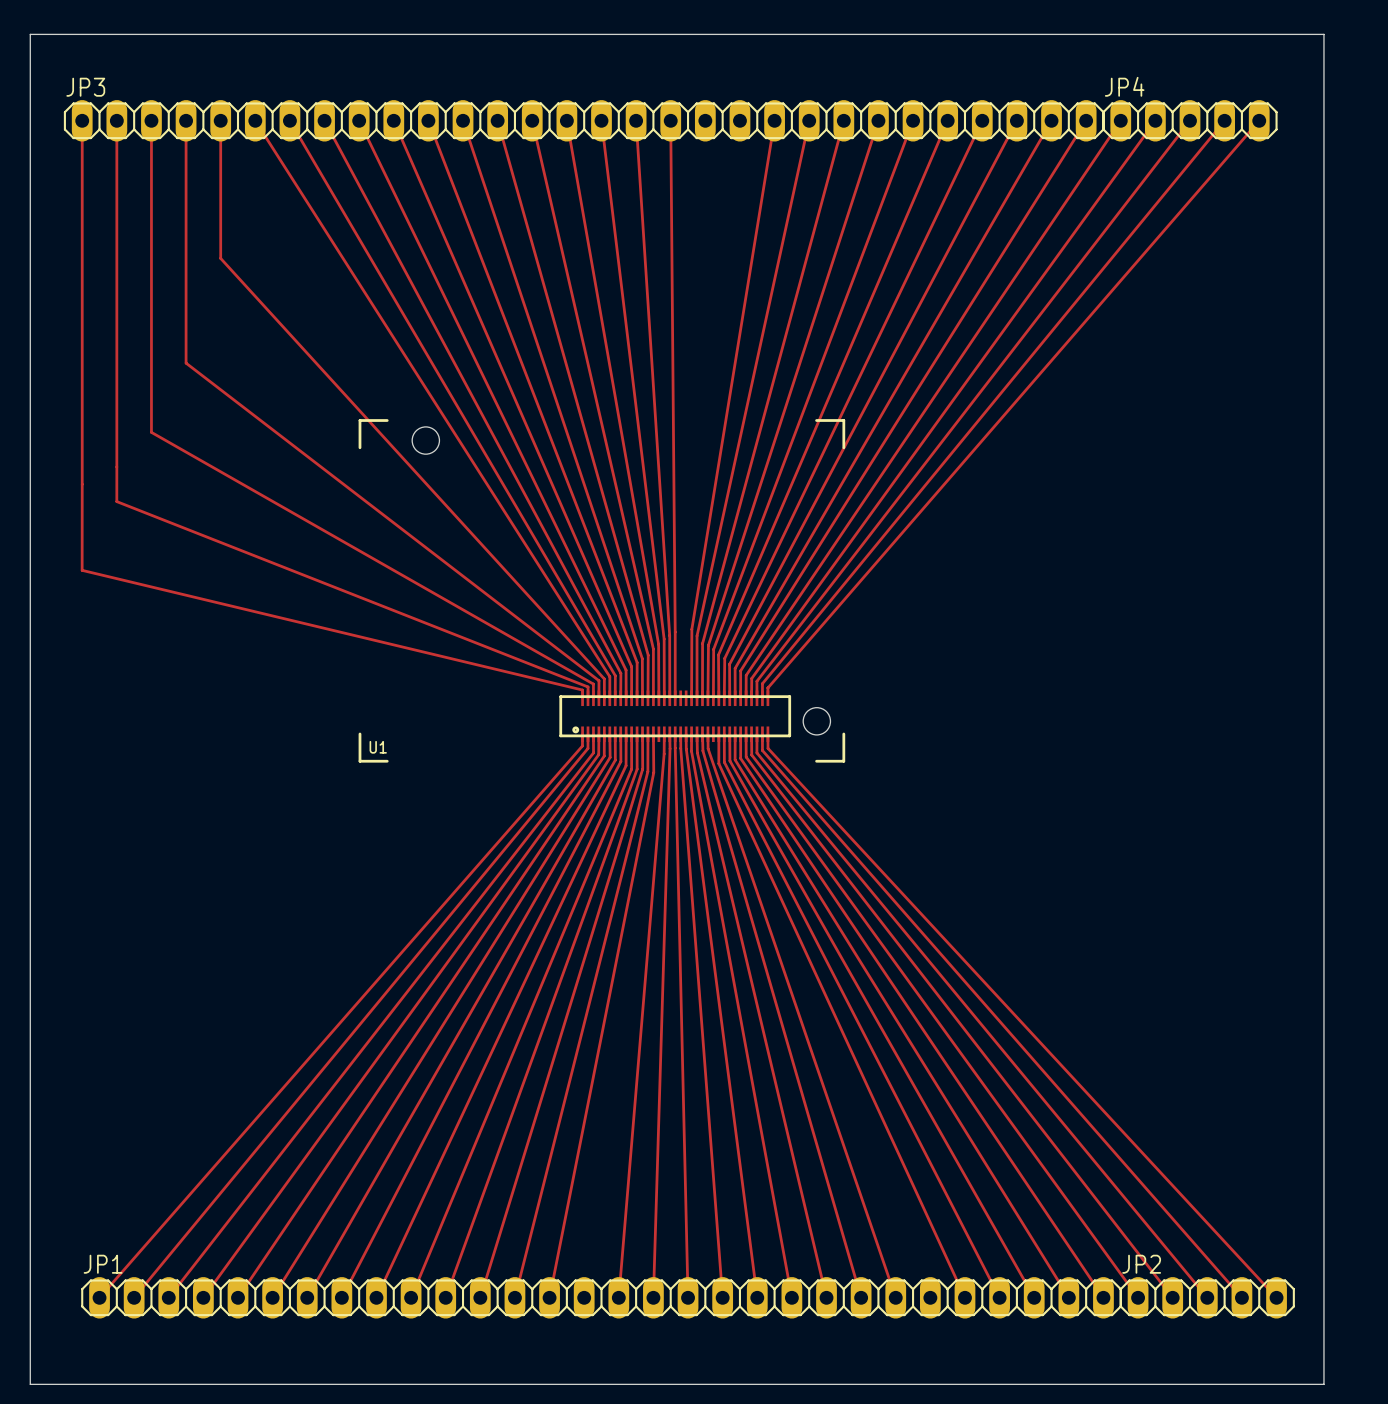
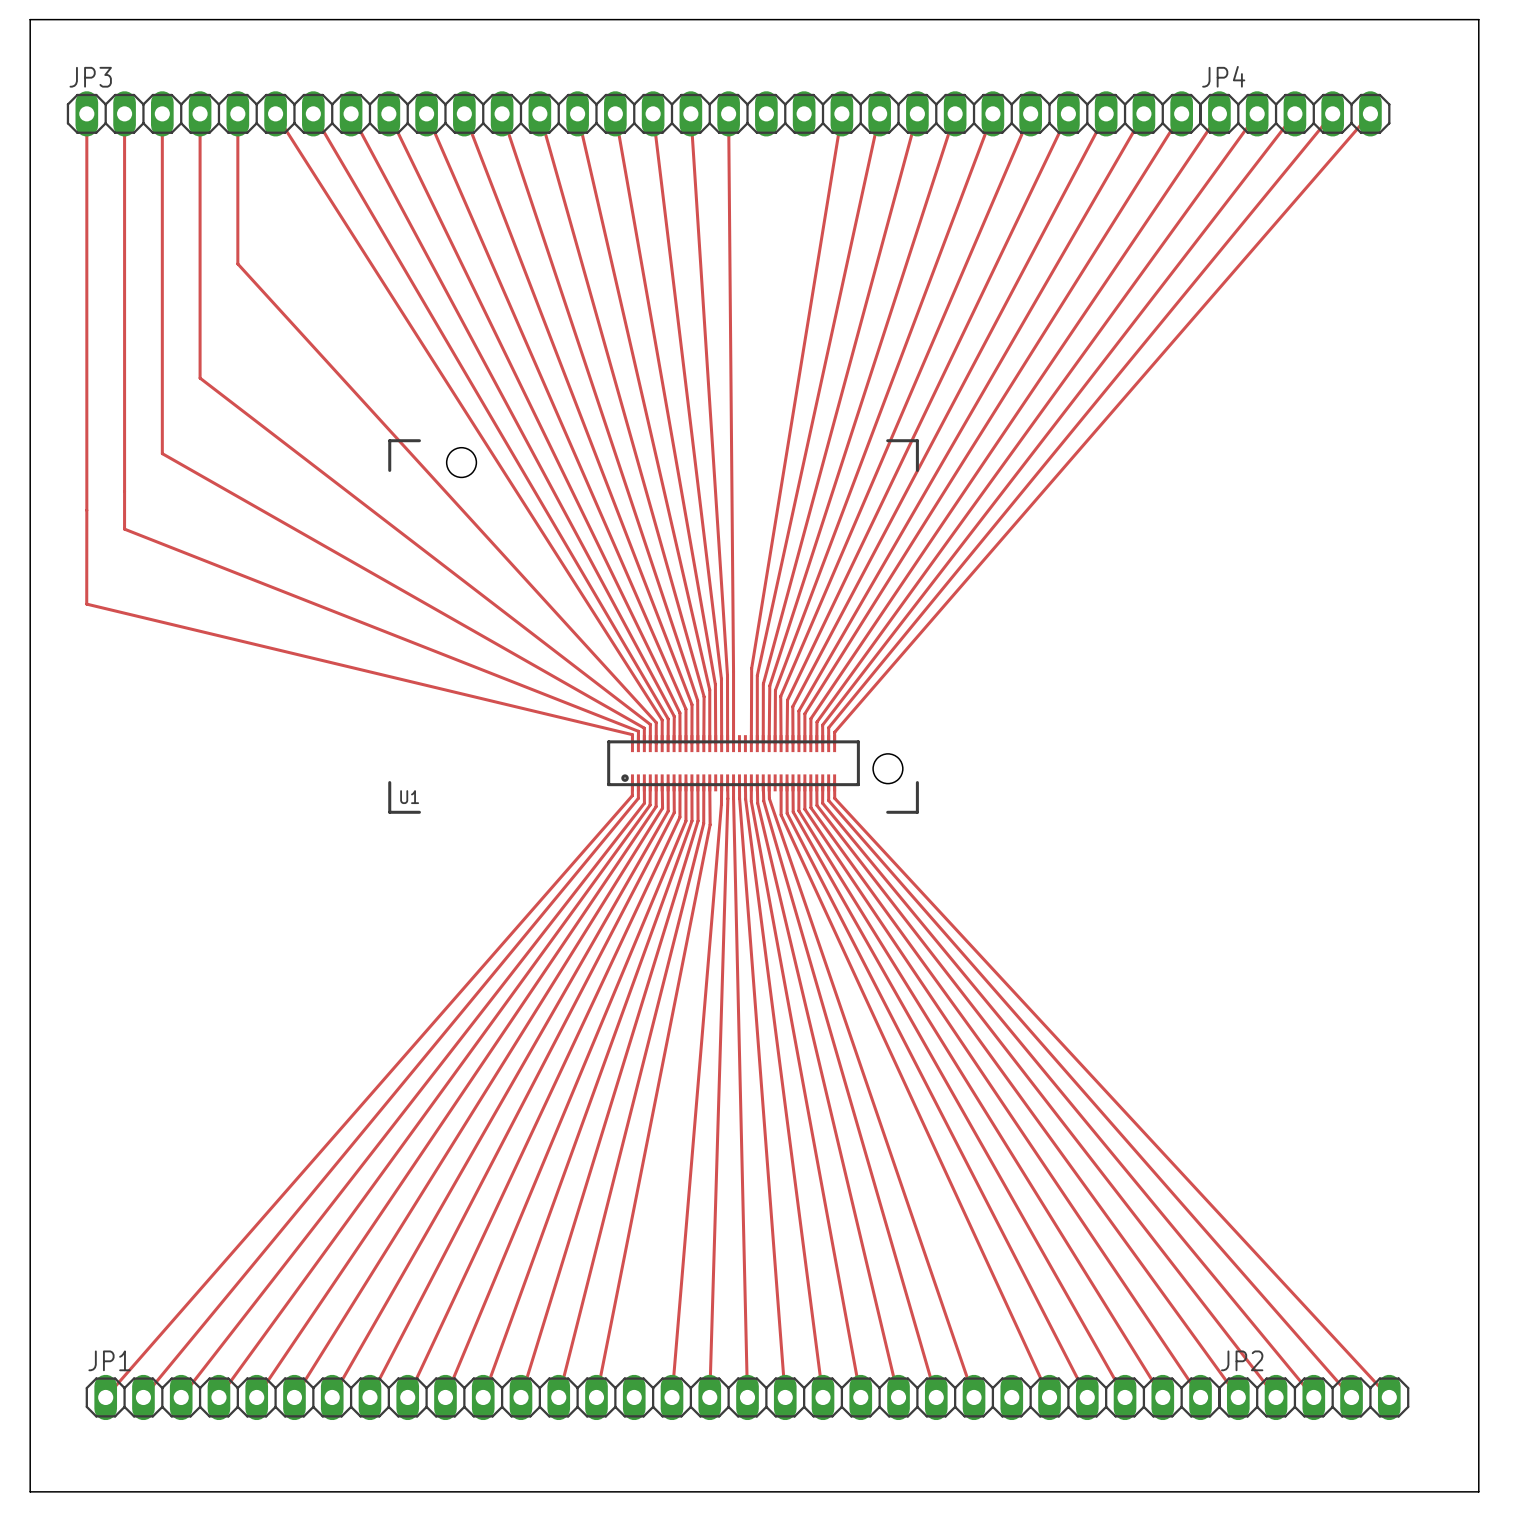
board edge: (1323, 34) (1323, 1384) -> (1441, 19) (1478, 19) (1478, 1491) (1441, 1491)

